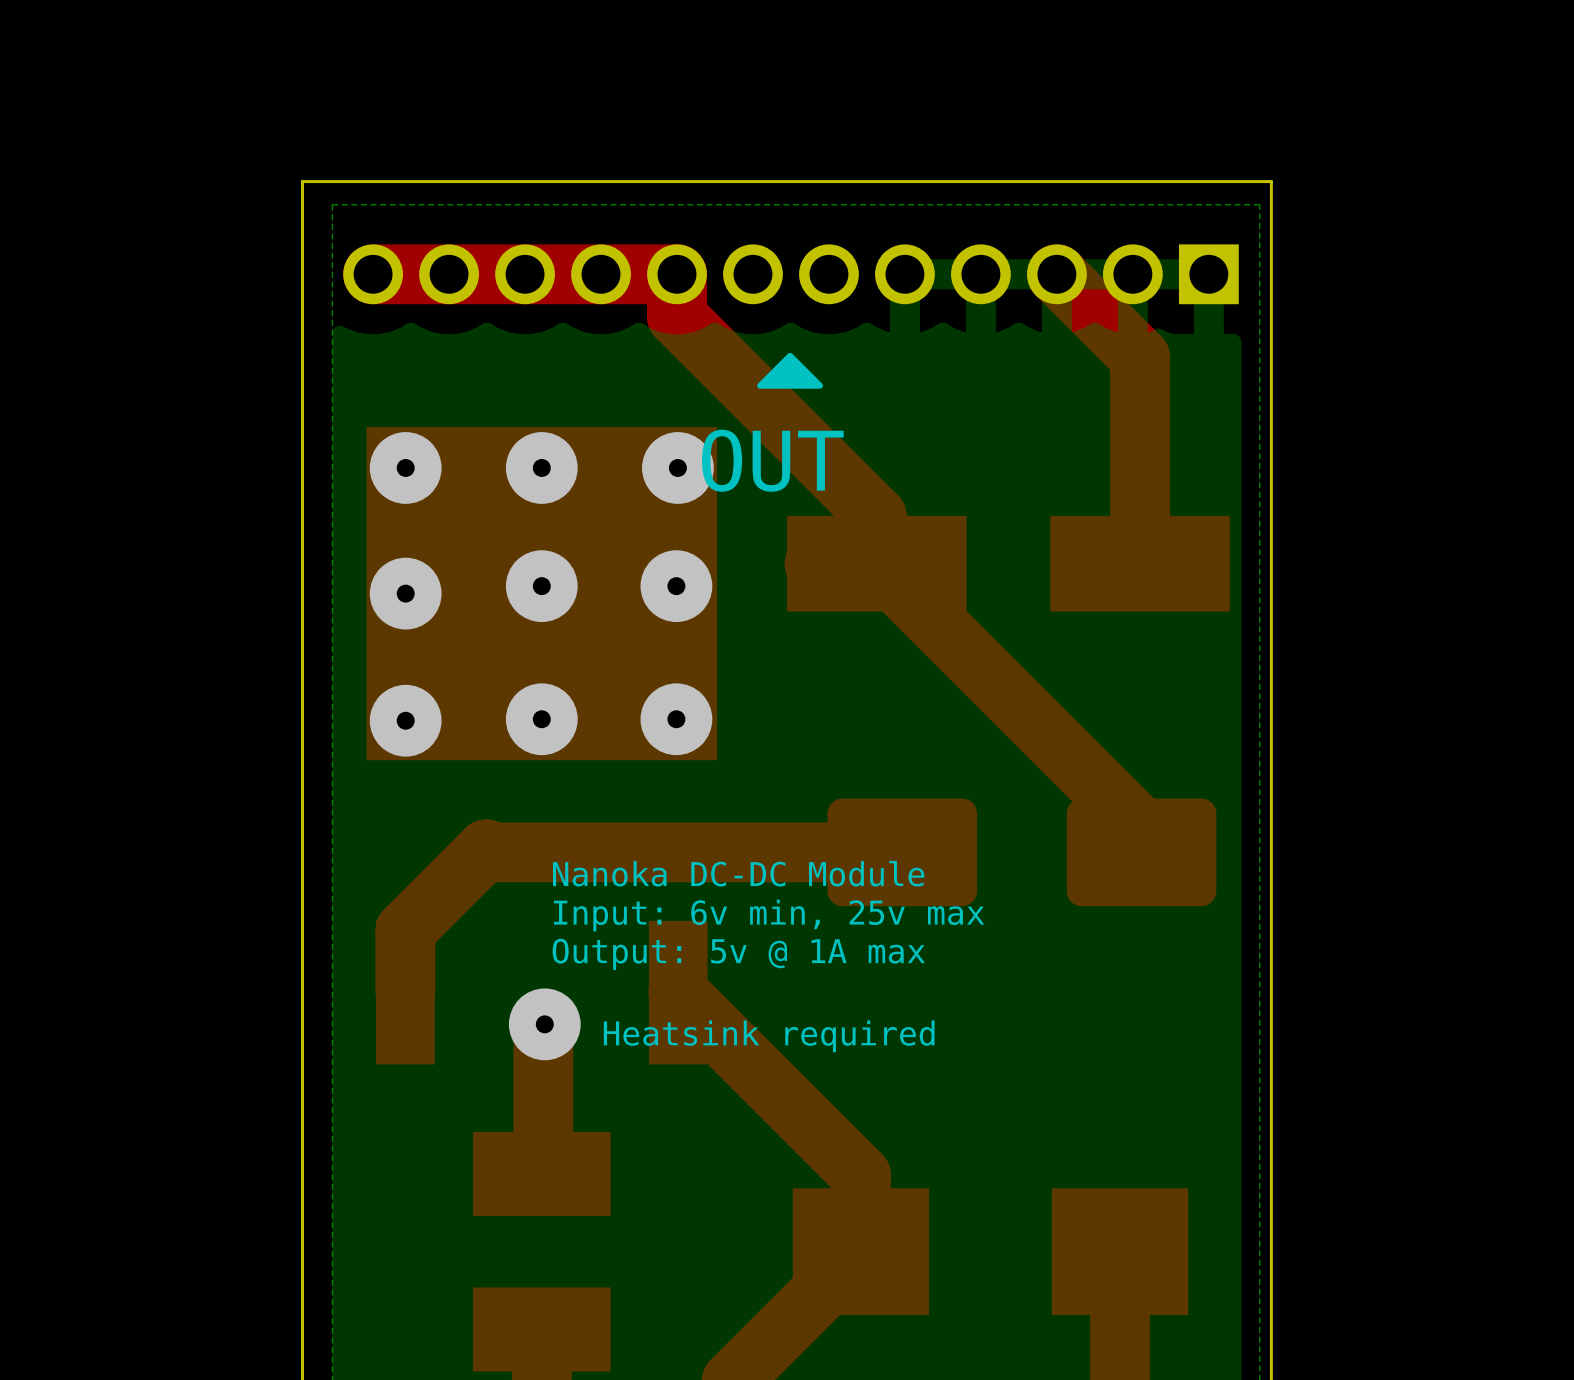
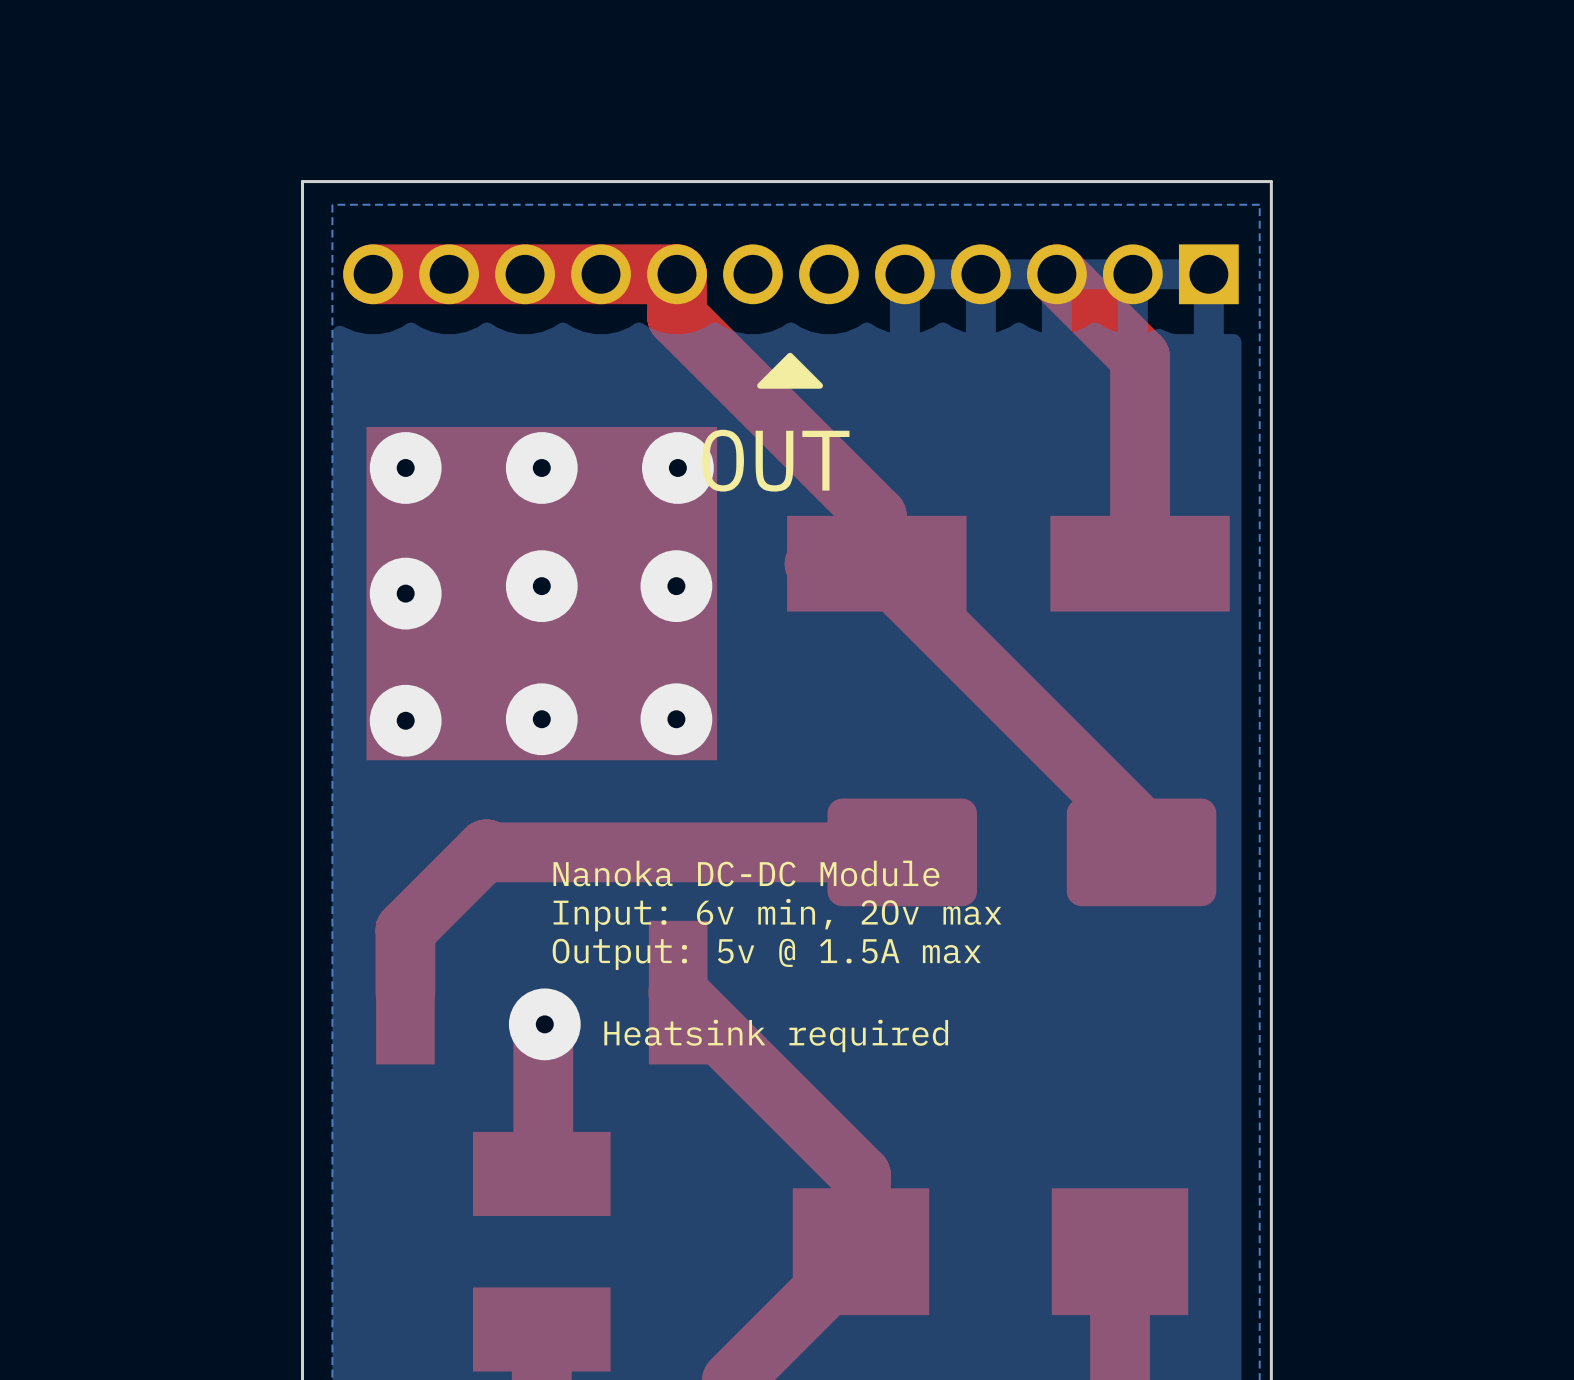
text: Input: 6v min, 25v max (769, 915) -> Input: 6v min, 2Ov max (777, 915)
text: Output: 5v @ 1A max (738, 954) -> Output: 5v @ 1.5A max (766, 954)

